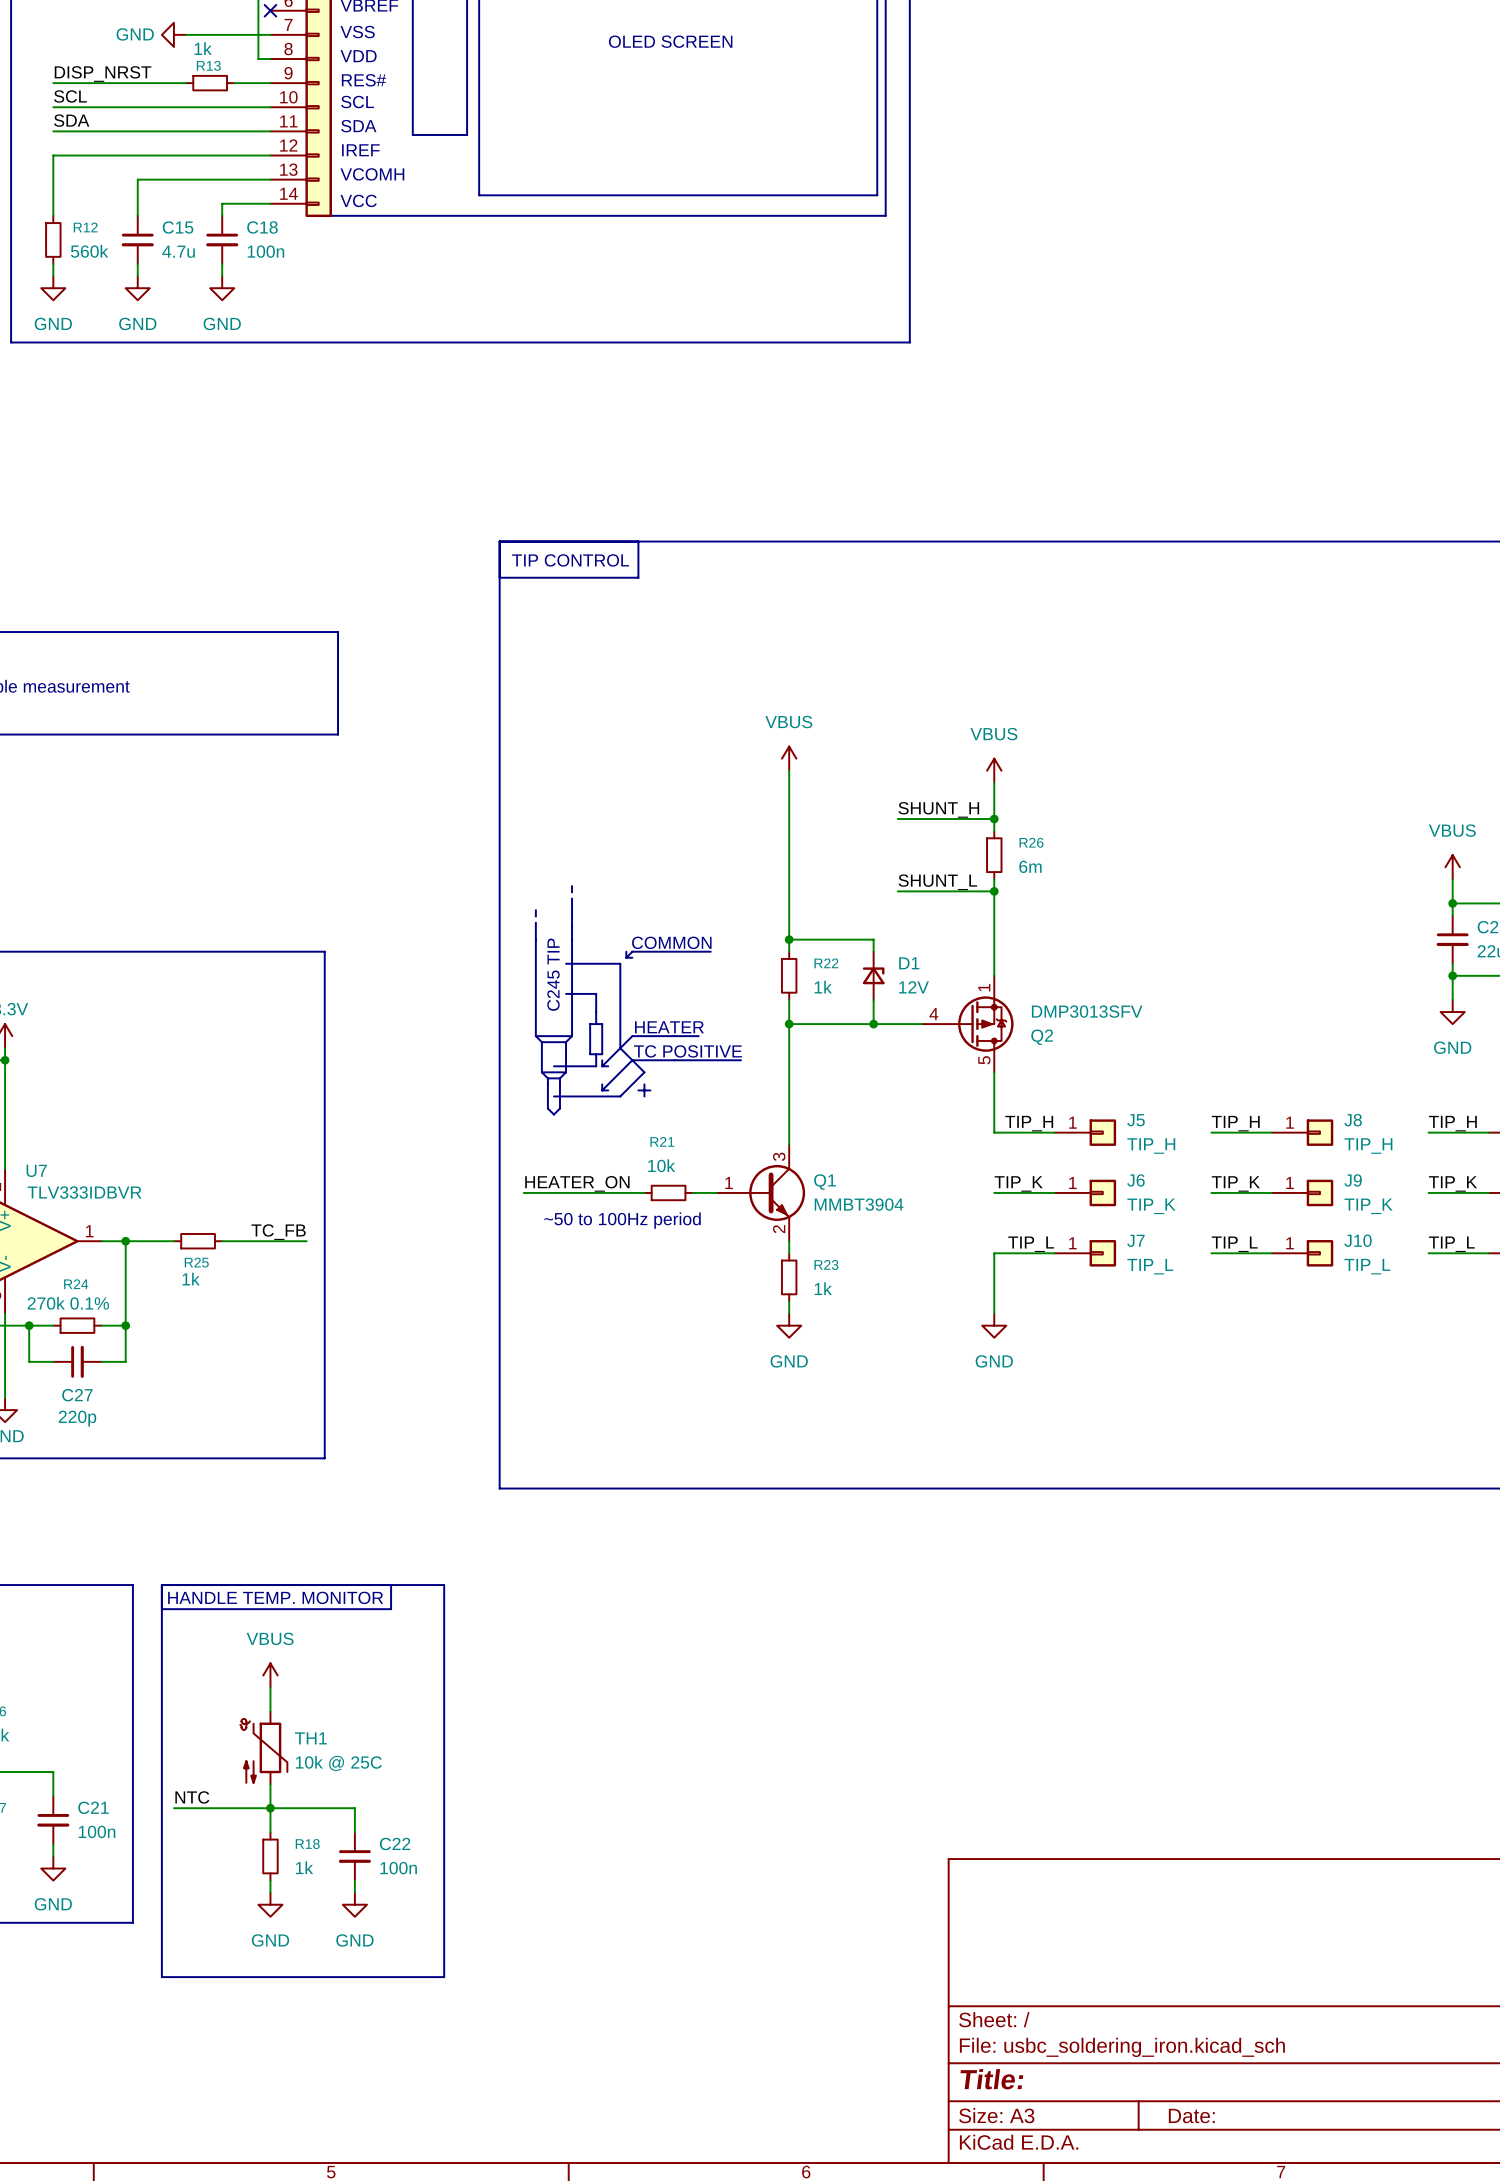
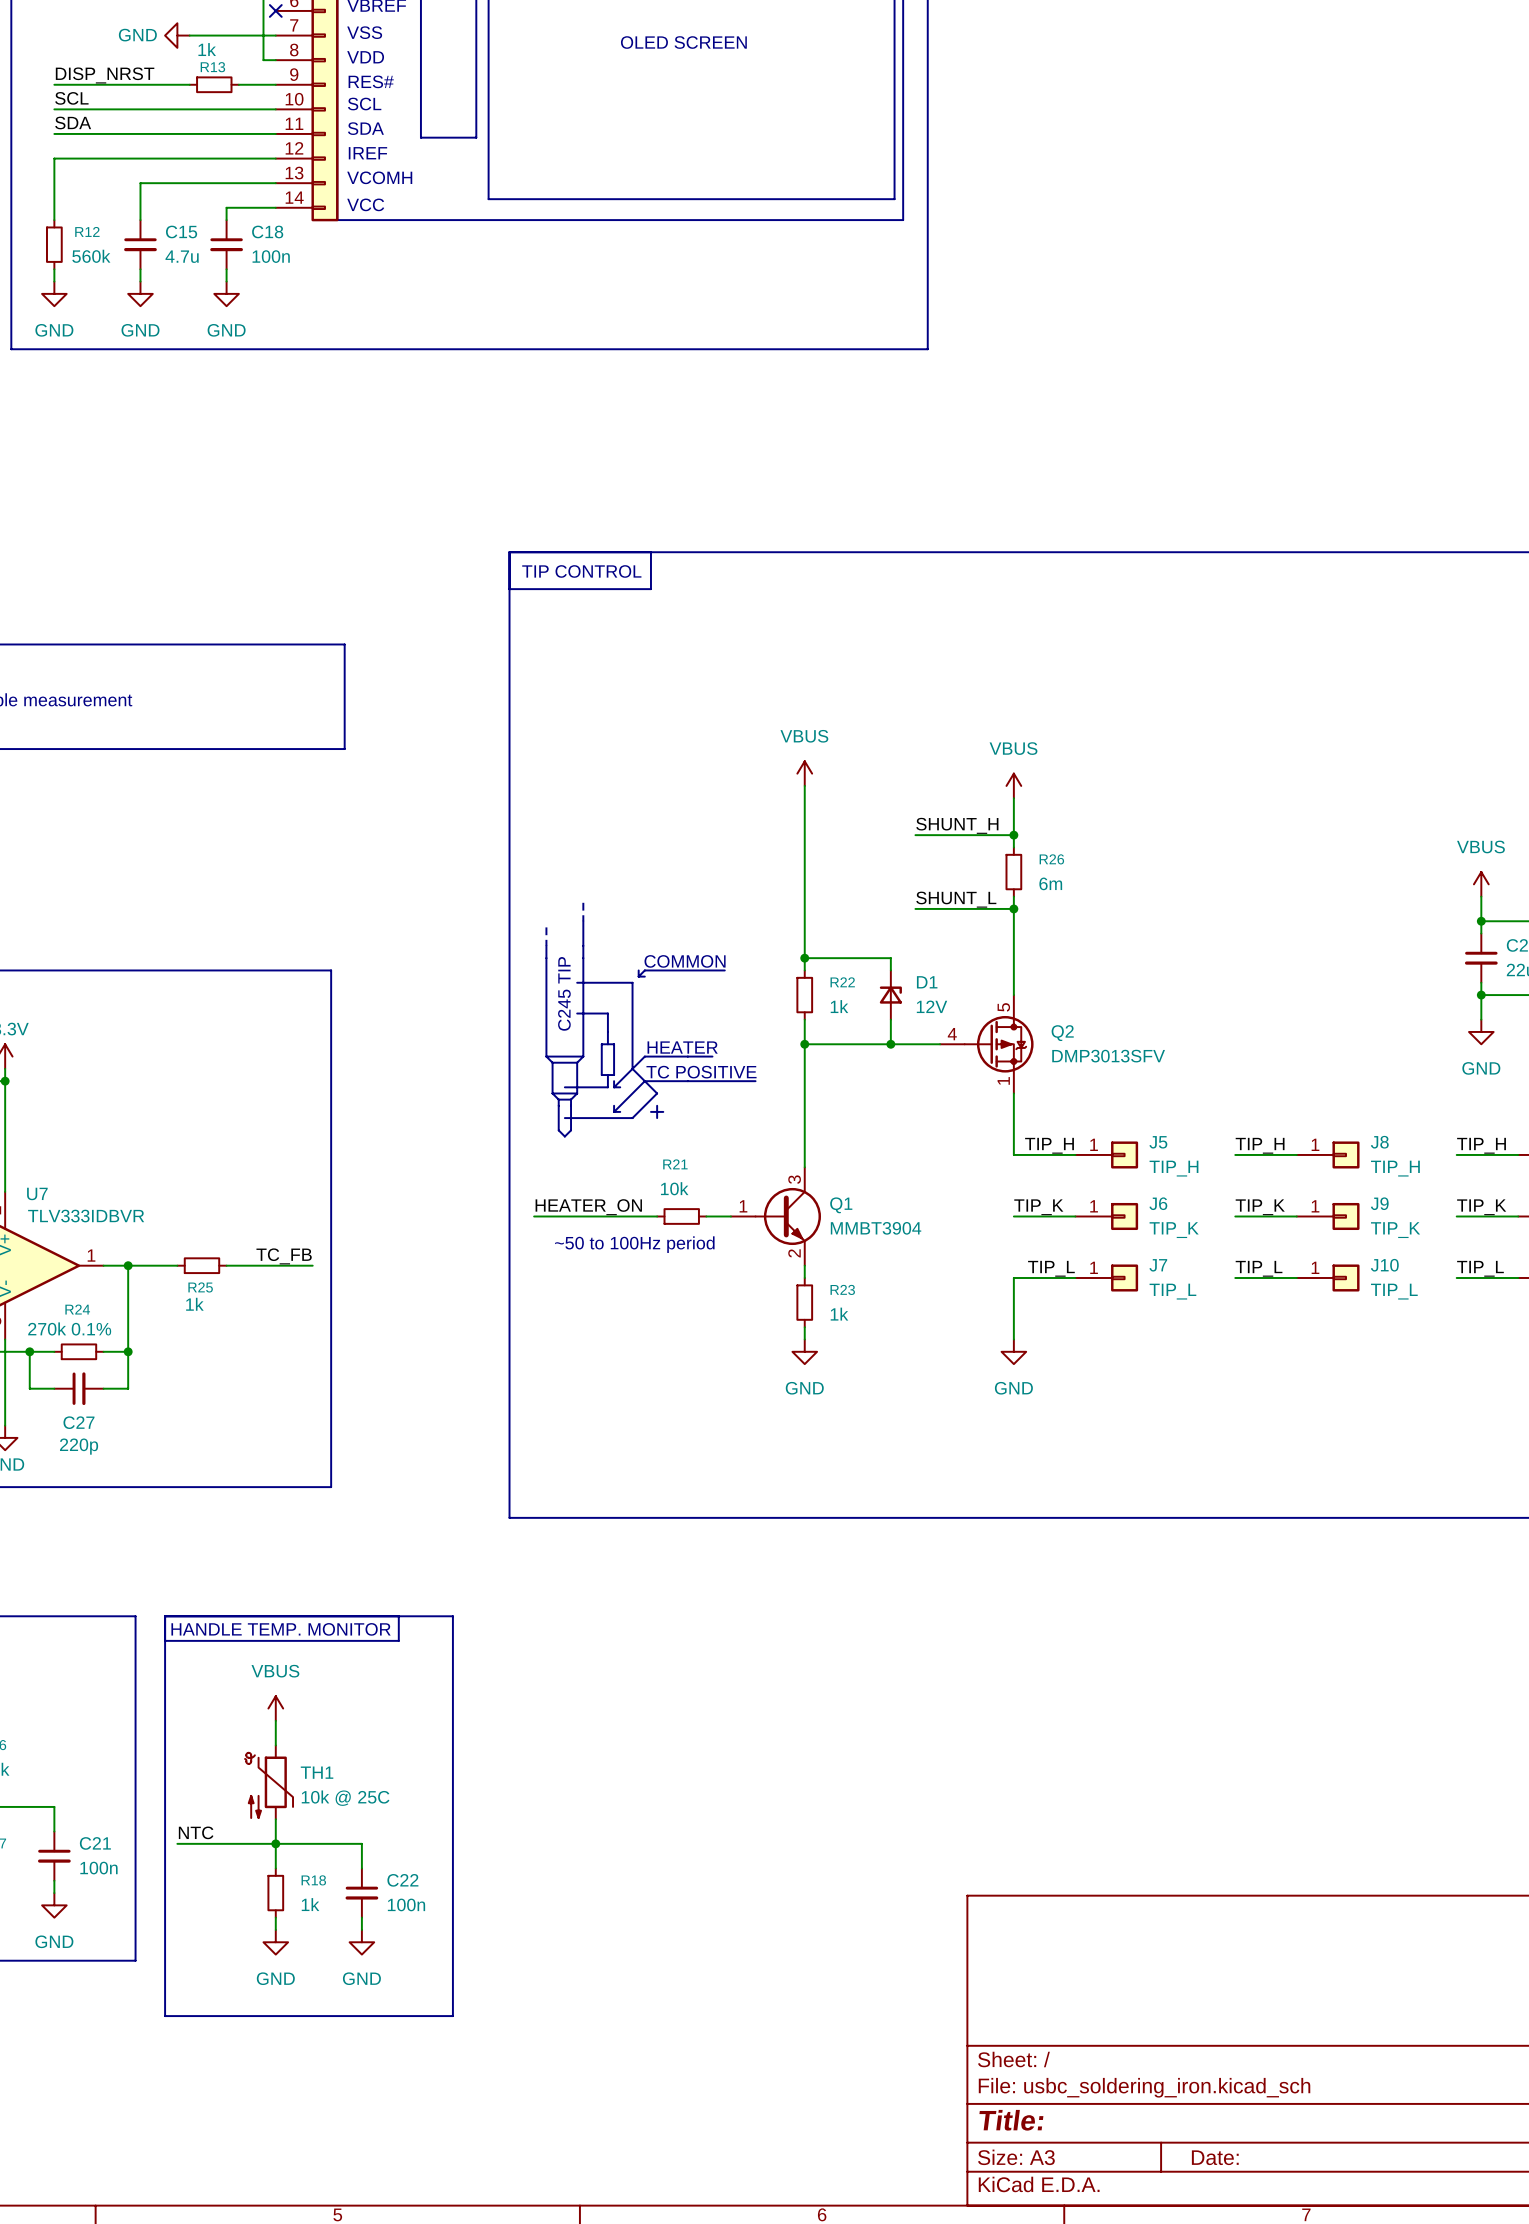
Q2 flip: as is (979, 1024) -> up-down (999, 1044)

